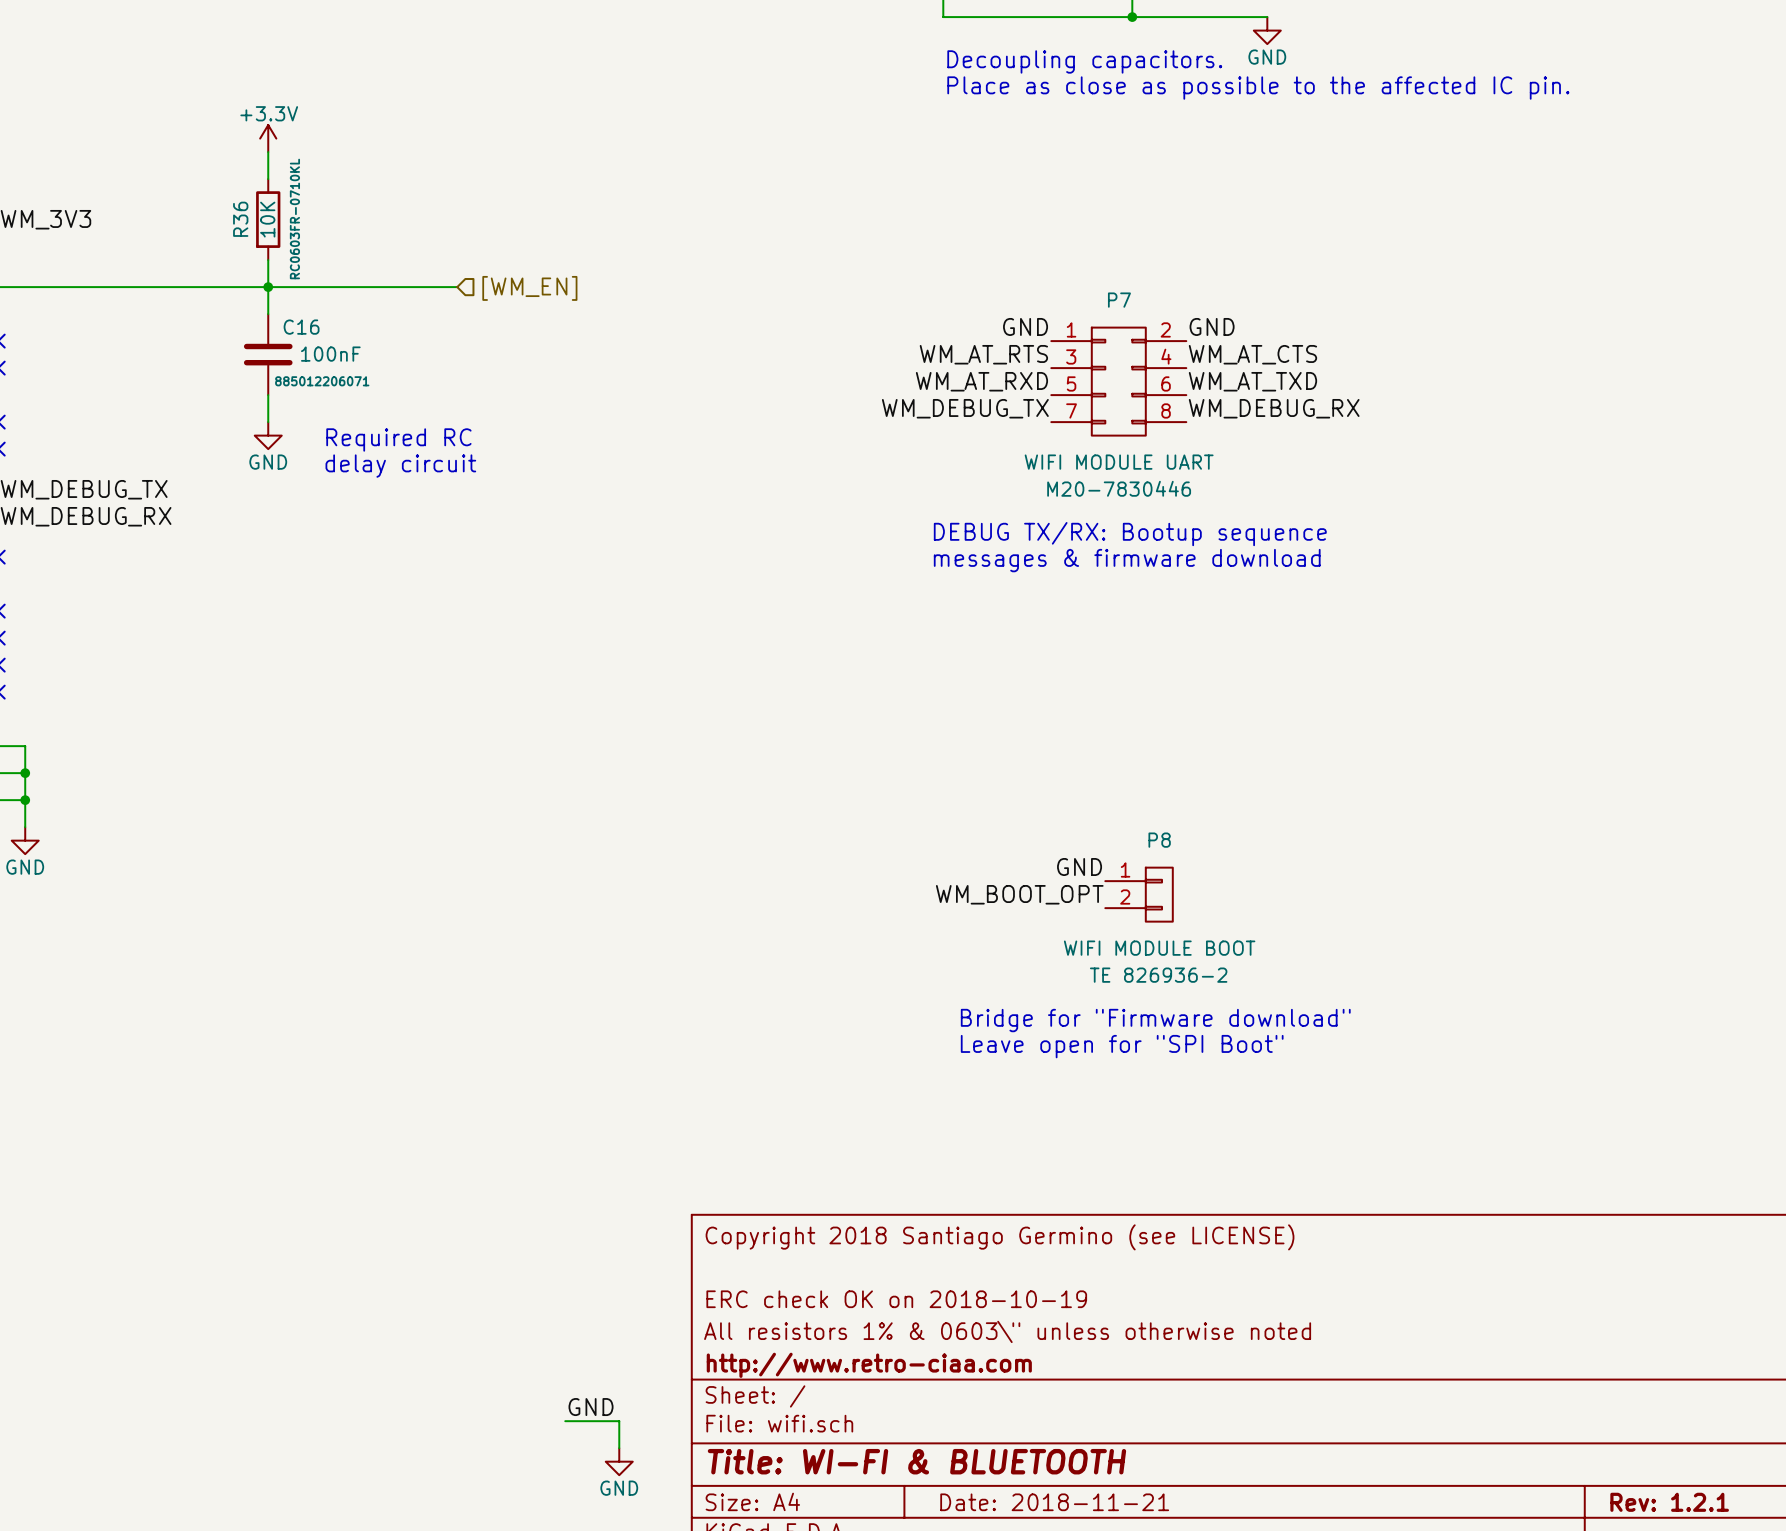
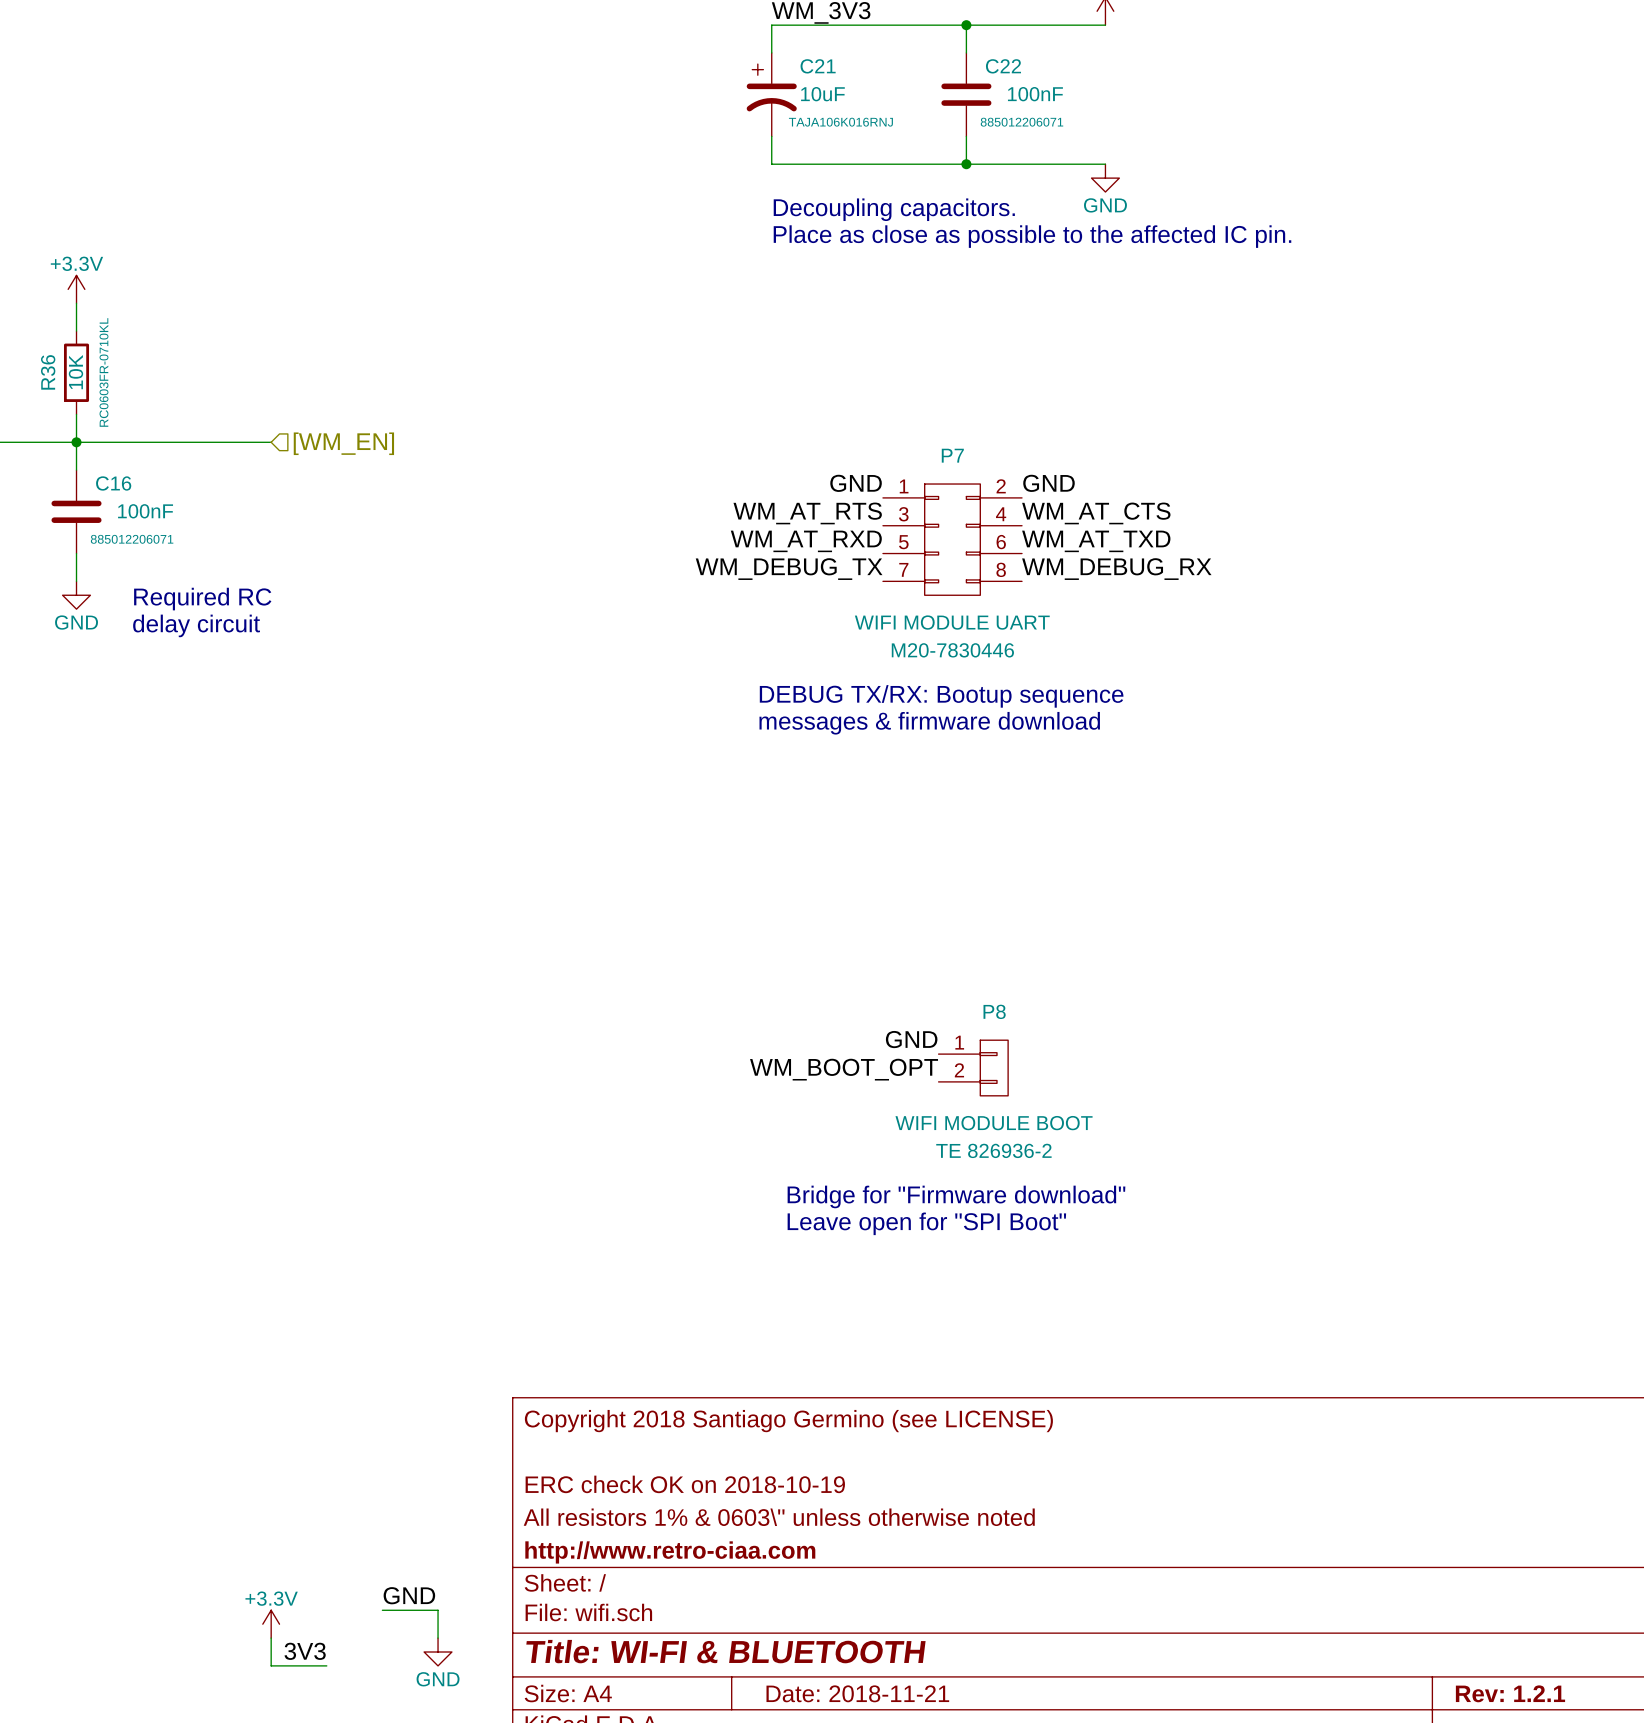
power symbol: none -> +3.3V (271, 1624)
wire: none -> (271, 1638) (271, 1665) (326, 1665)
label: none -> 3V3 (305, 1651)

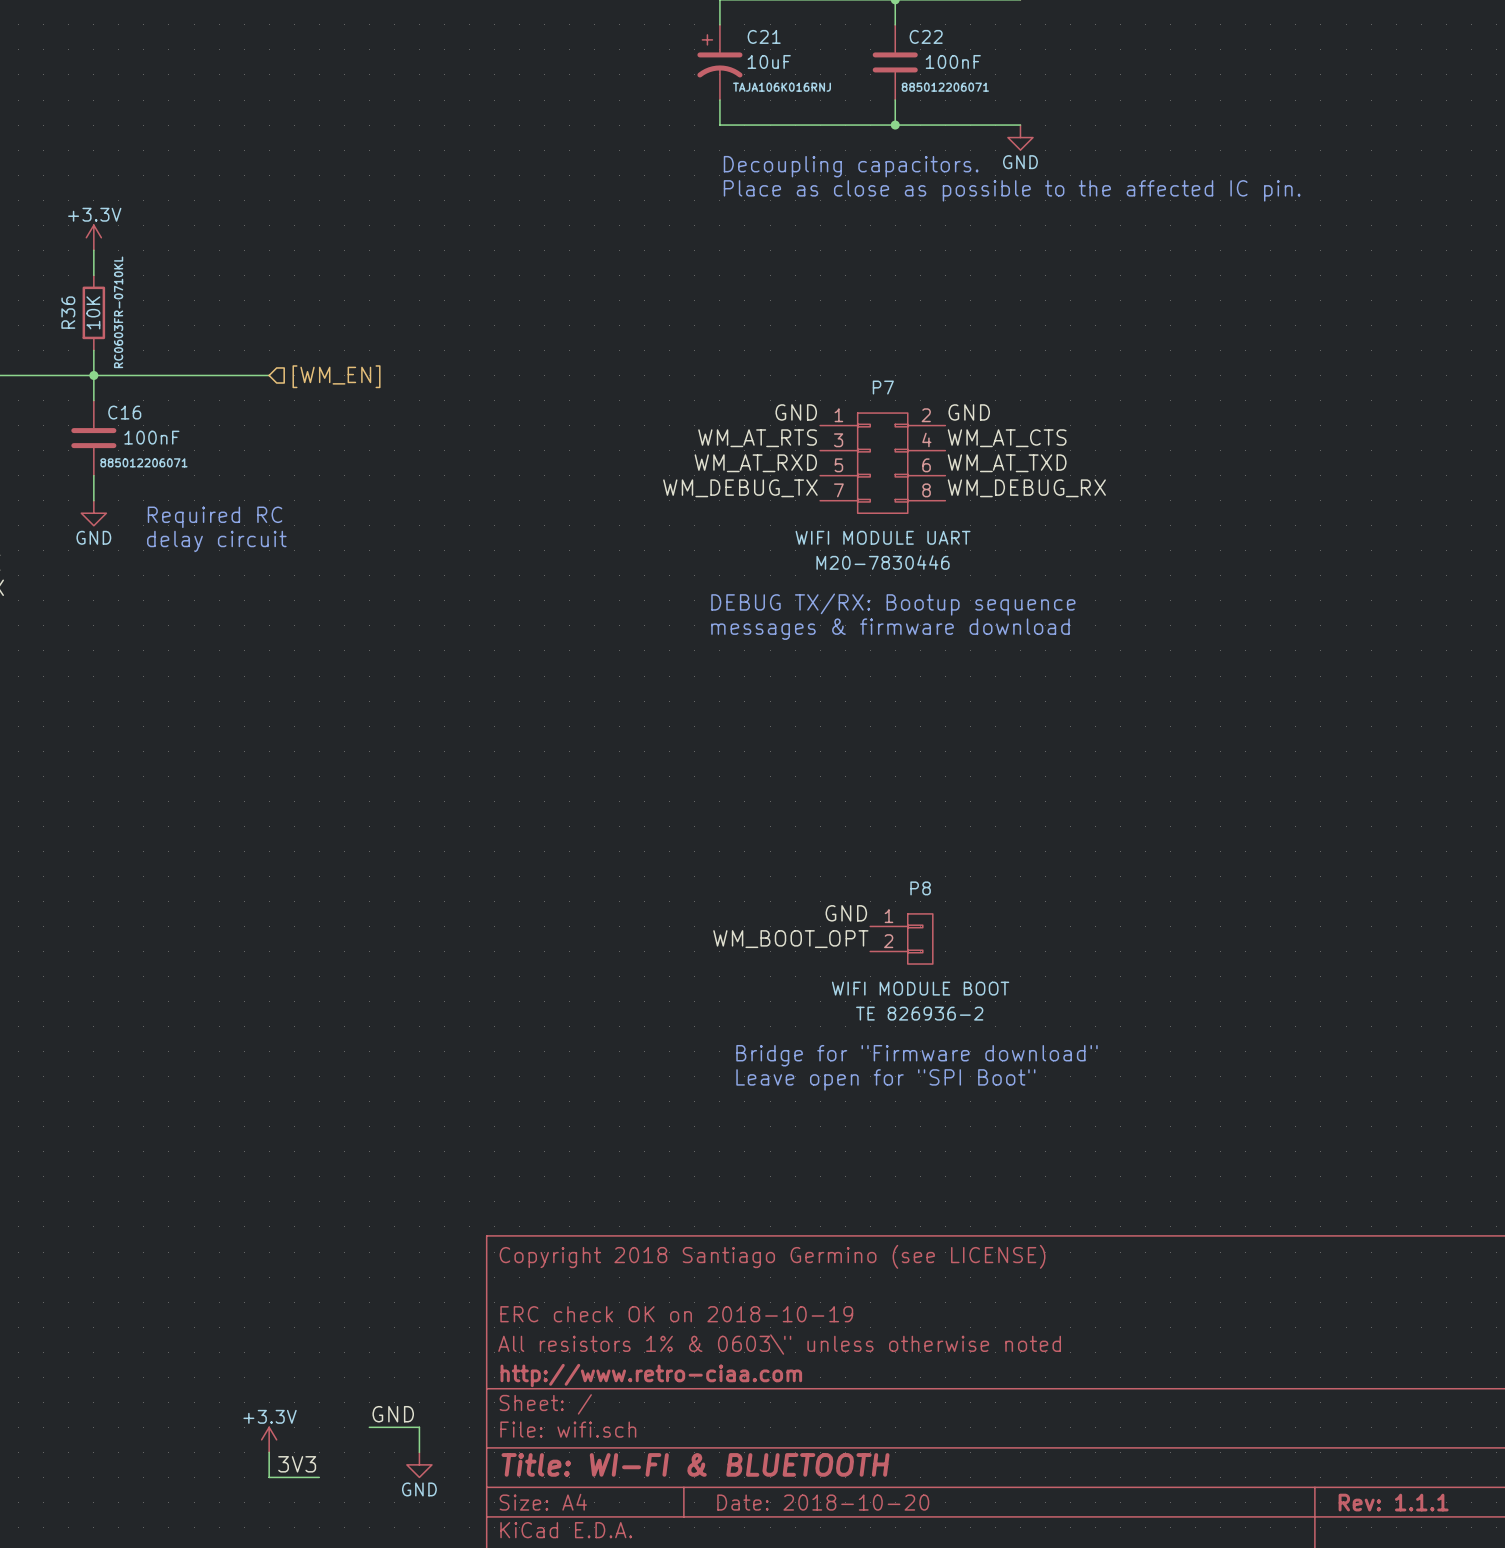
title block: Date: 2018-11-21 (857, 1693) -> Date: 2018-10-20 (823, 1502)
title block: Rev: 1.2.1 (1510, 1693) -> Rev: 1.1.1 (1393, 1502)

